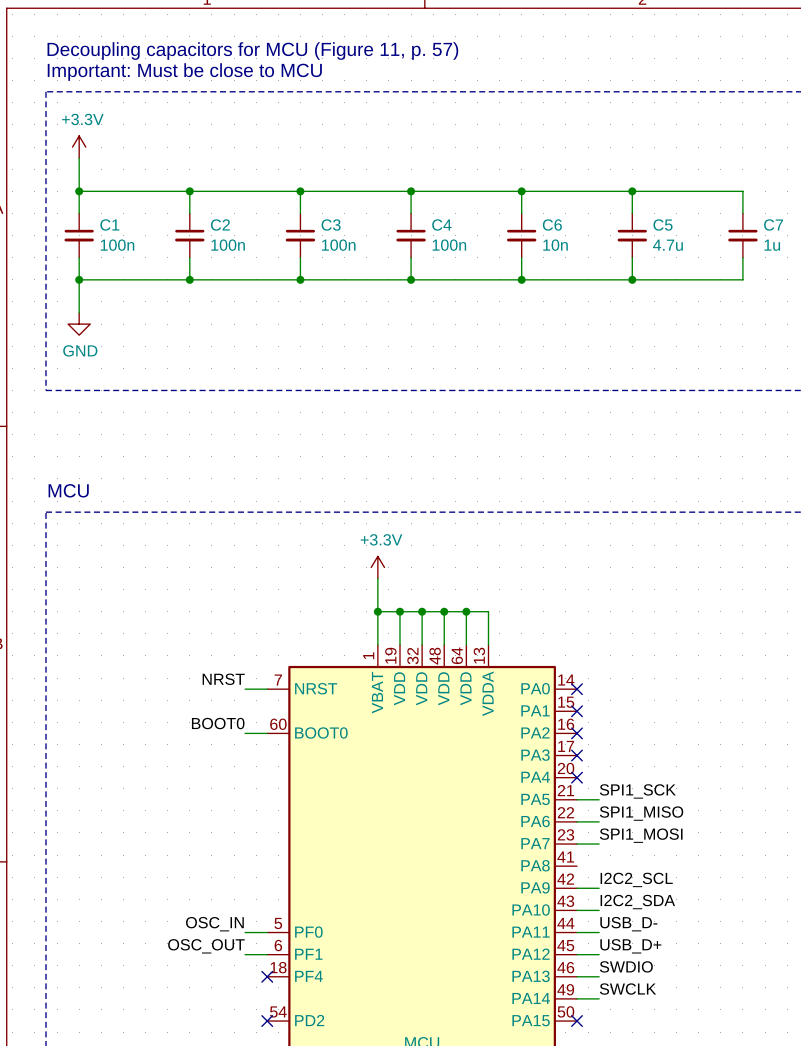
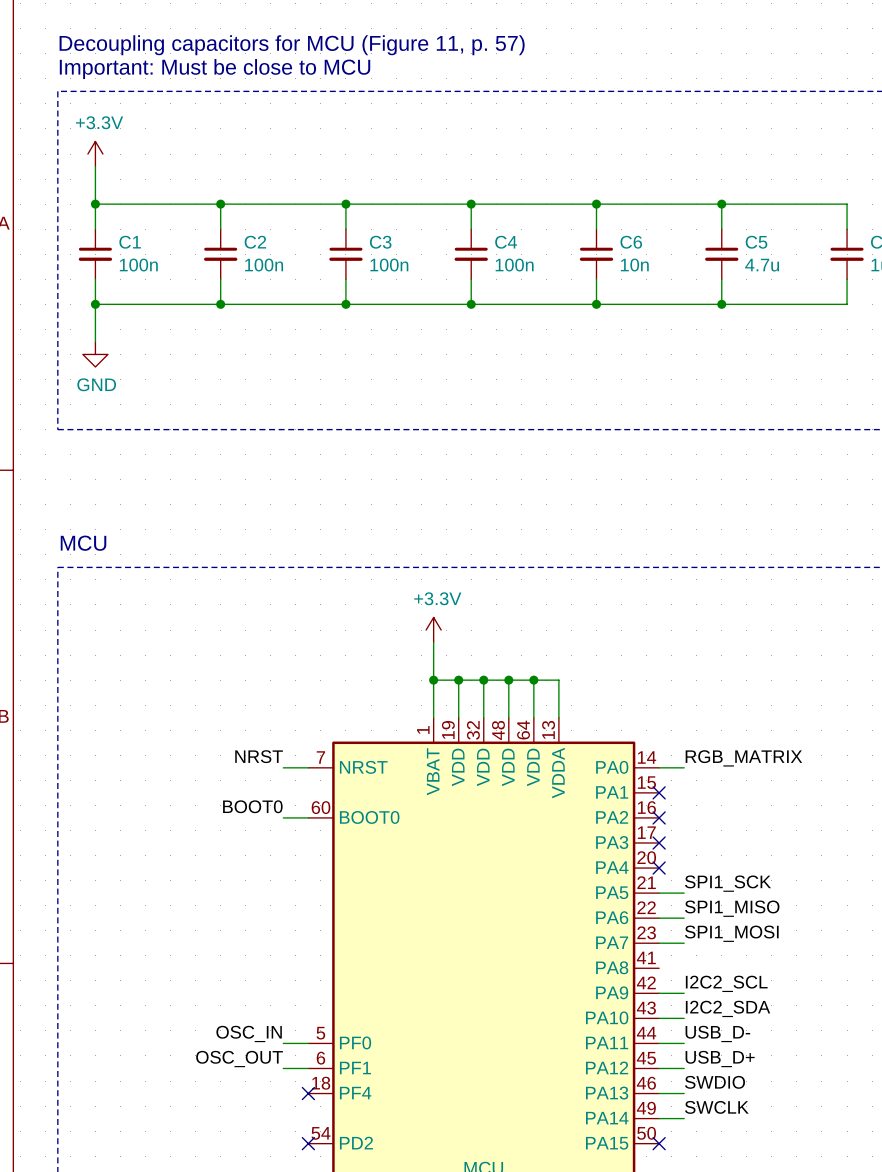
label: none -> RGB_MATRIX (743, 758)
wire: none -> (659, 767) (684, 767)
no-connect mark: (576, 689) -> none

